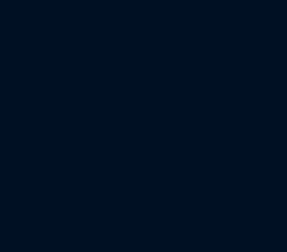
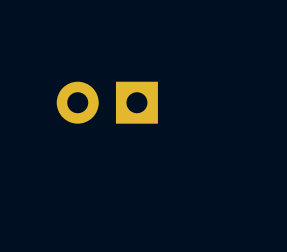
part: none -> (107, 102)

